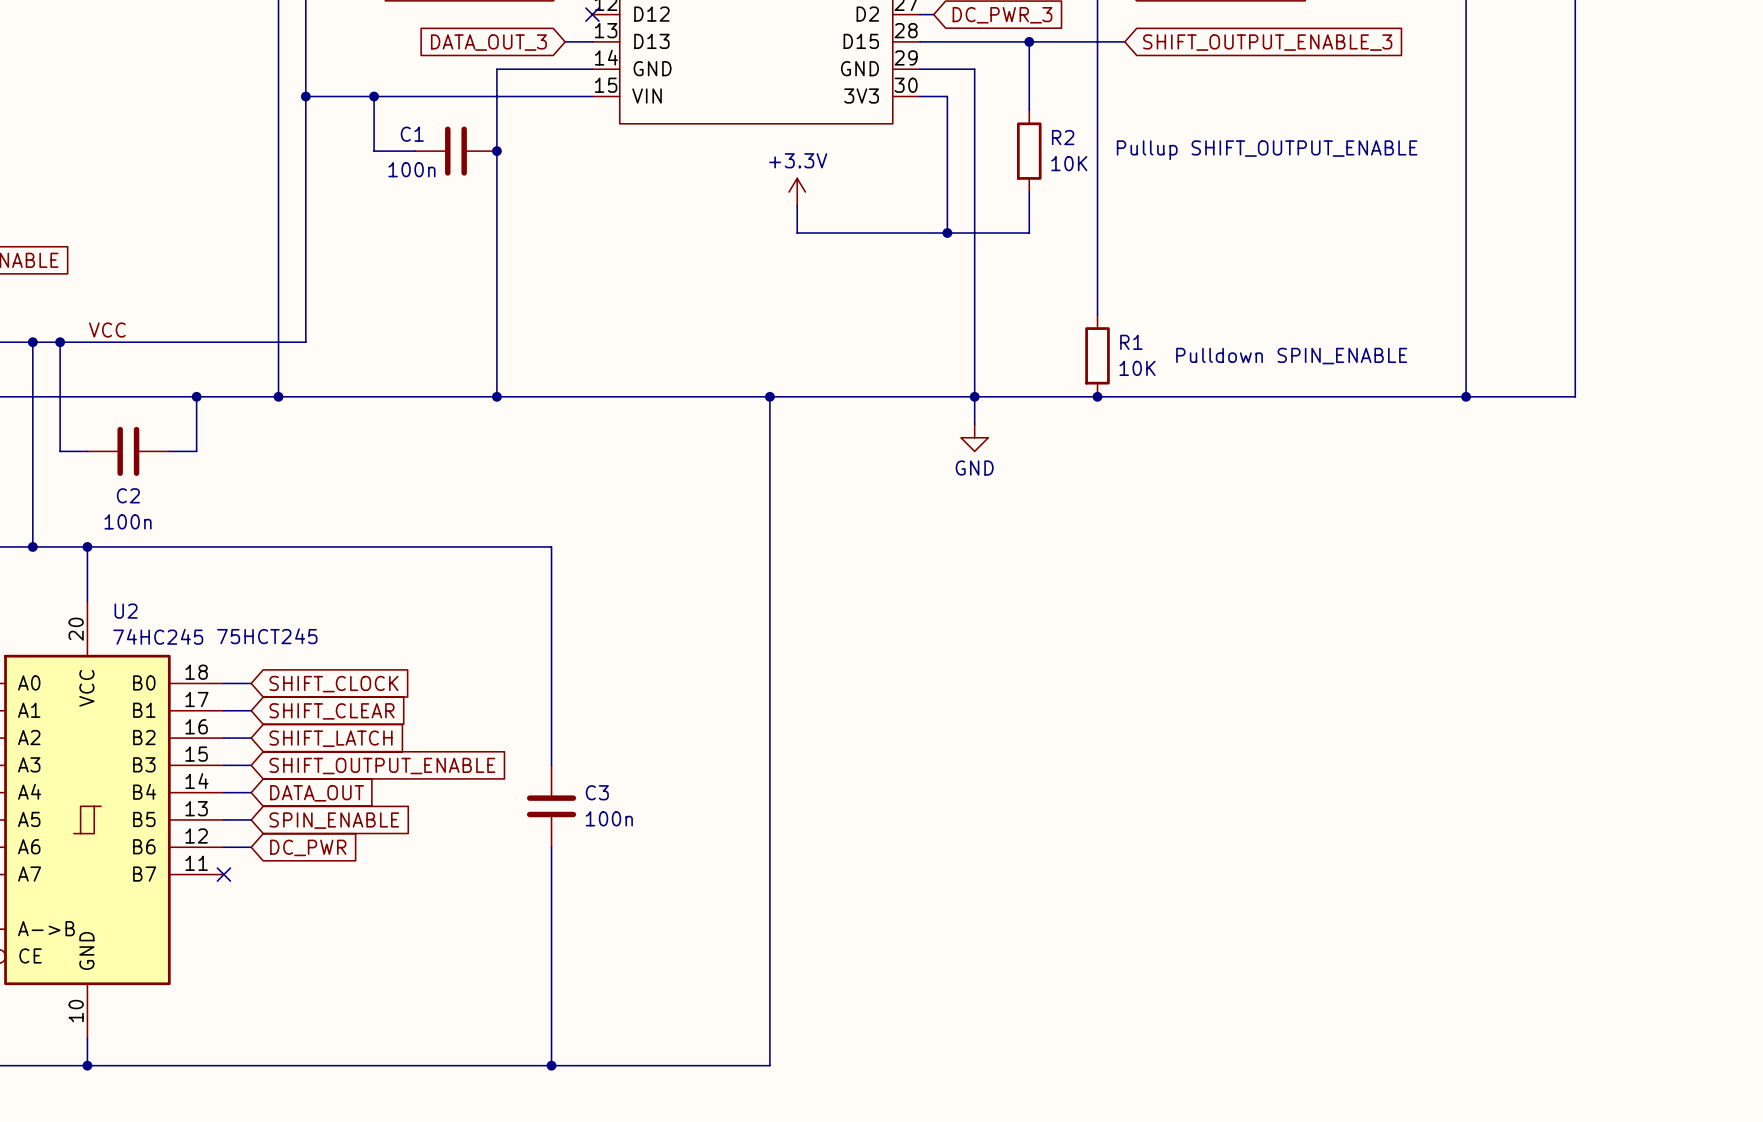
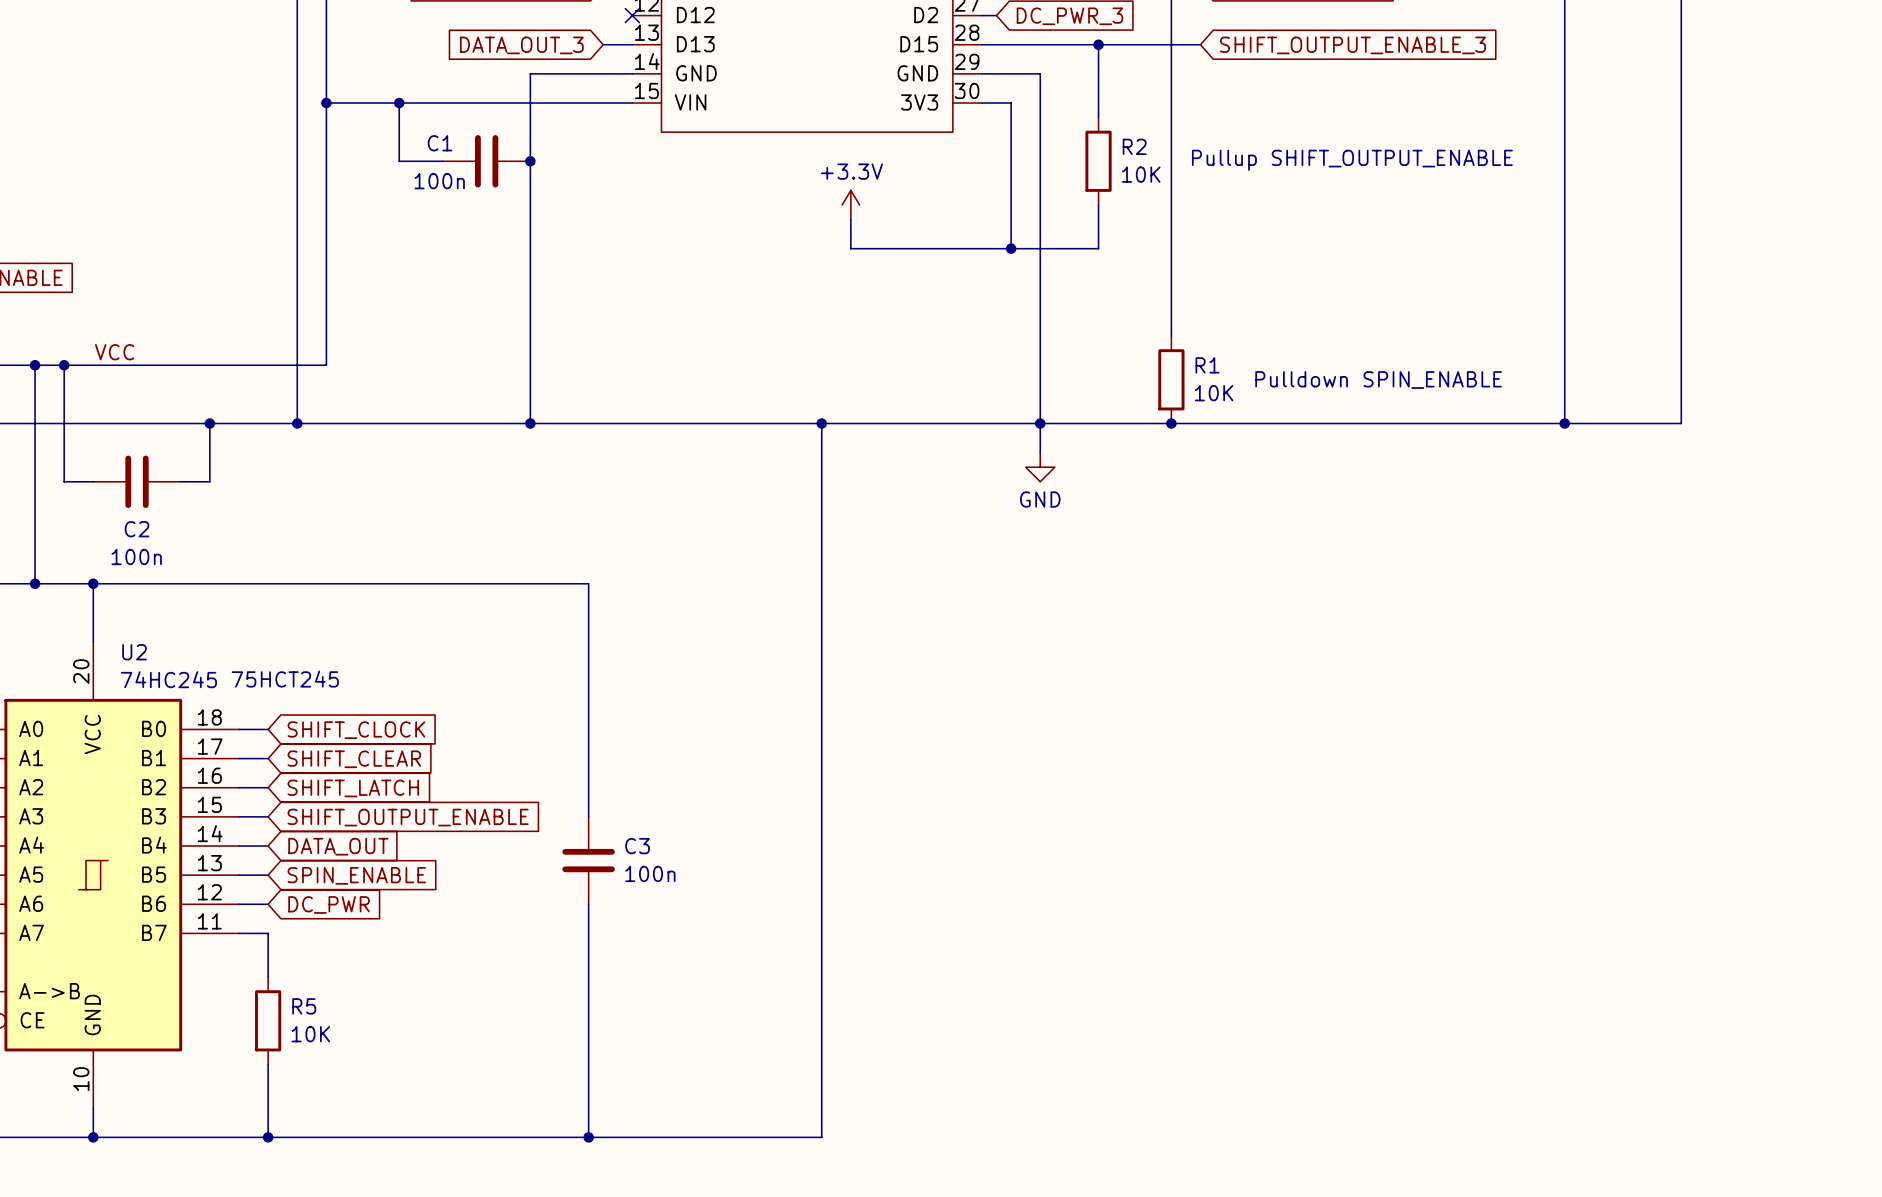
wire: none -> (238, 933) (268, 933) (268, 977)
no-connect mark: (223, 874) -> none
R5: none -> 10K (268, 1020)
wire: none -> (268, 1064) (268, 1137)
junction: none -> (268, 1137)

